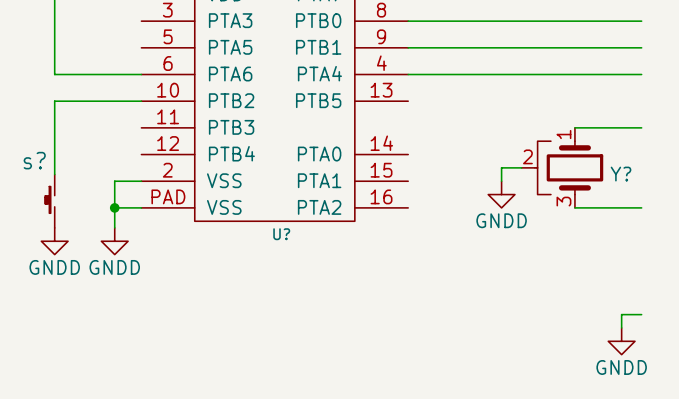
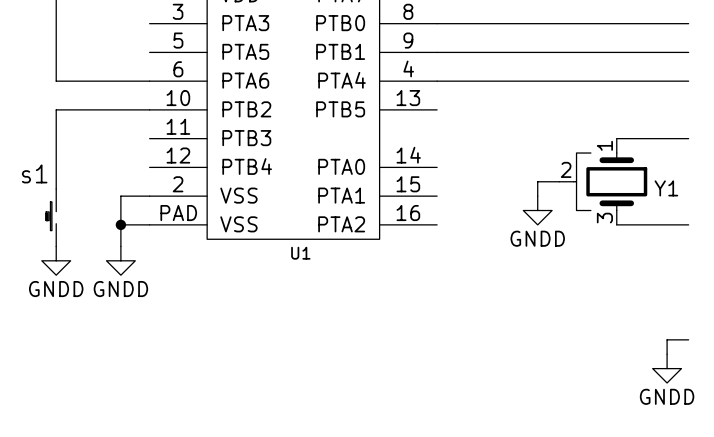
s? name: s? (34, 160) -> s1 (34, 173)
Y? name: Y? (621, 174) -> Y1 (666, 188)
U? name: U? (281, 234) -> U1 (300, 253)

